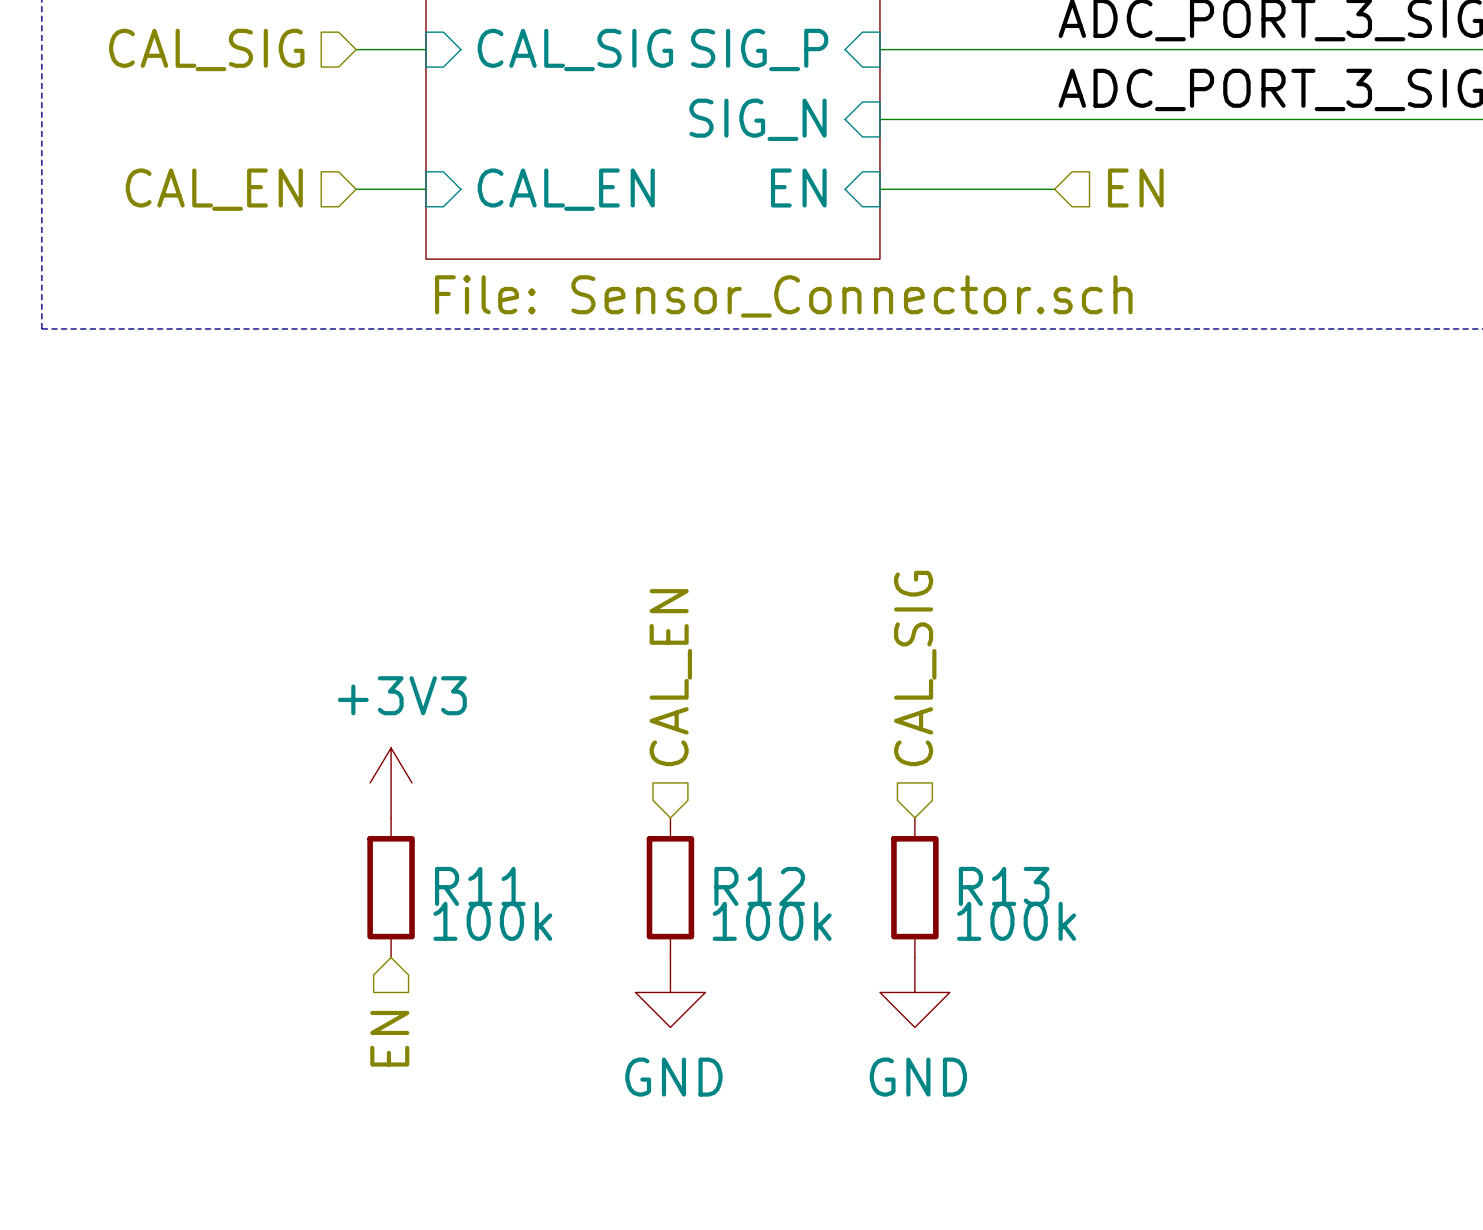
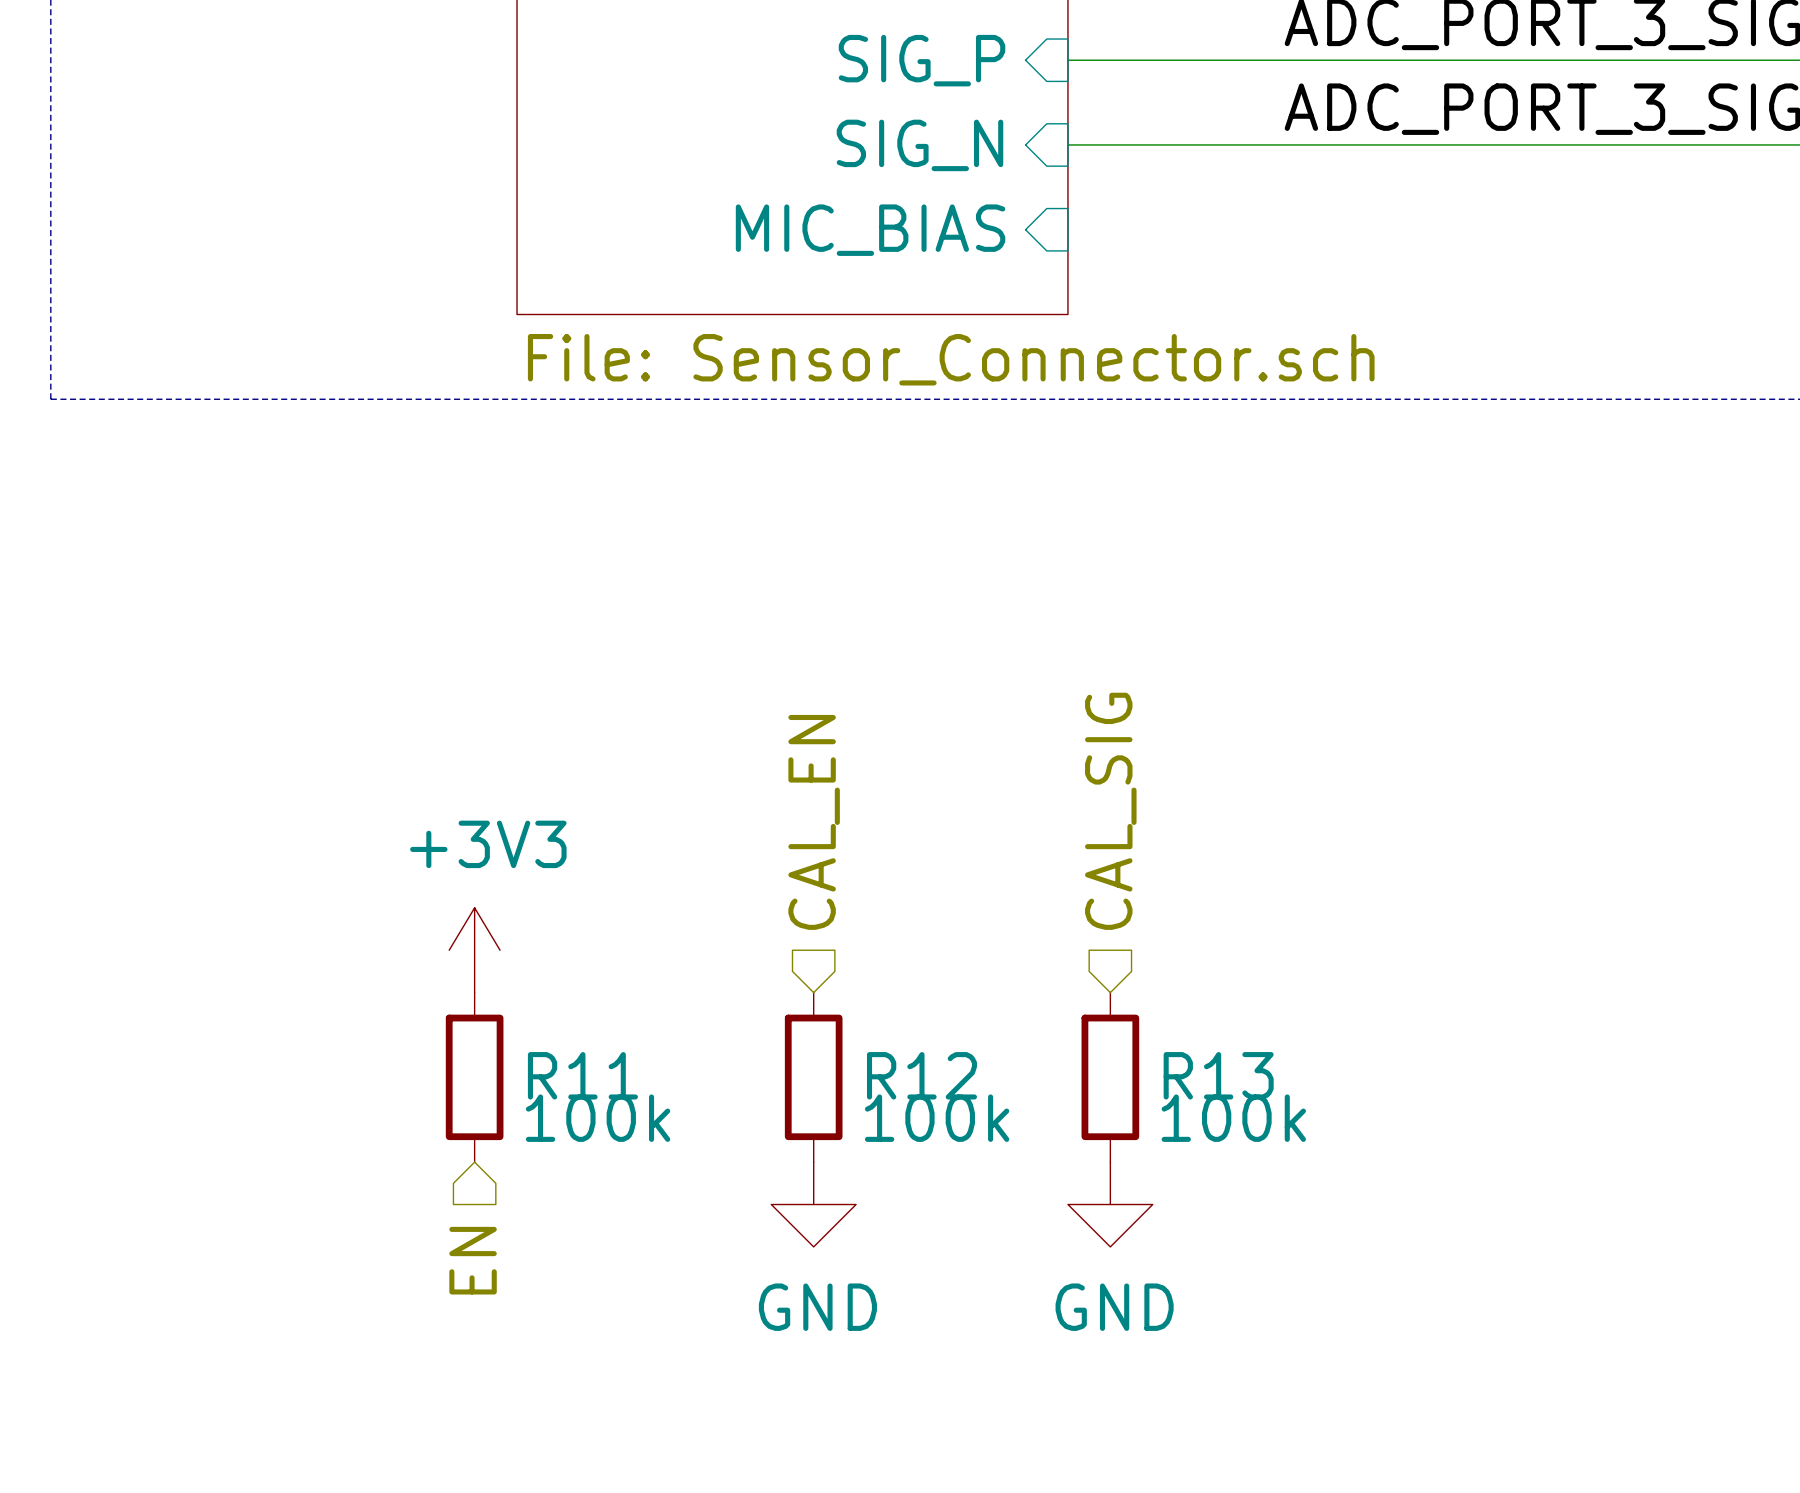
hierarchical label: CAL_SIG (206, 49) -> none
wire: (356, 49) (426, 49) -> none
sheet pin: CAL_SIG (575, 49) -> none
sheet pin: EN (798, 187) -> MIC_BIAS (870, 230)
hierarchical label: EN (1135, 187) -> none
hierarchical label: CAL_EN (214, 189) -> none
wire: (356, 189) (426, 189) -> none
sheet pin: CAL_EN (566, 189) -> none
wire: (879, 189) (1054, 189) -> none

